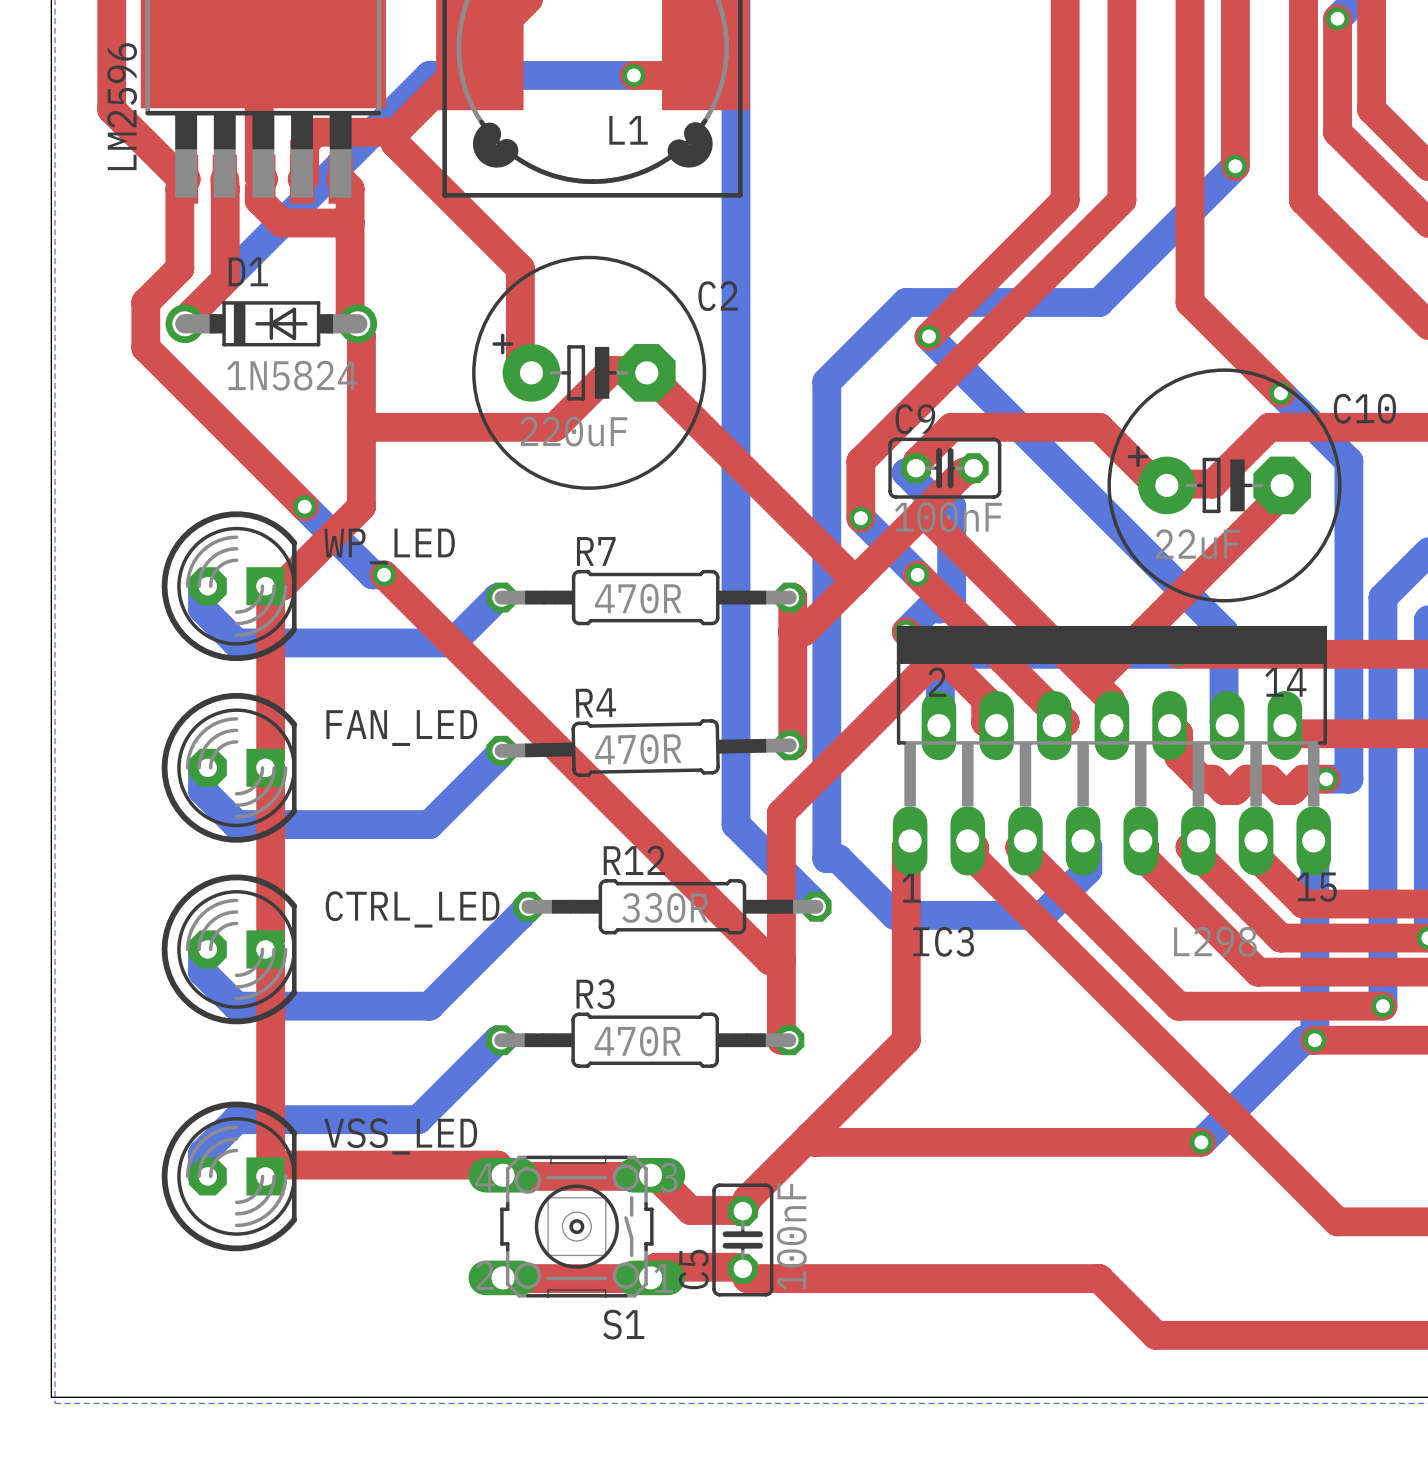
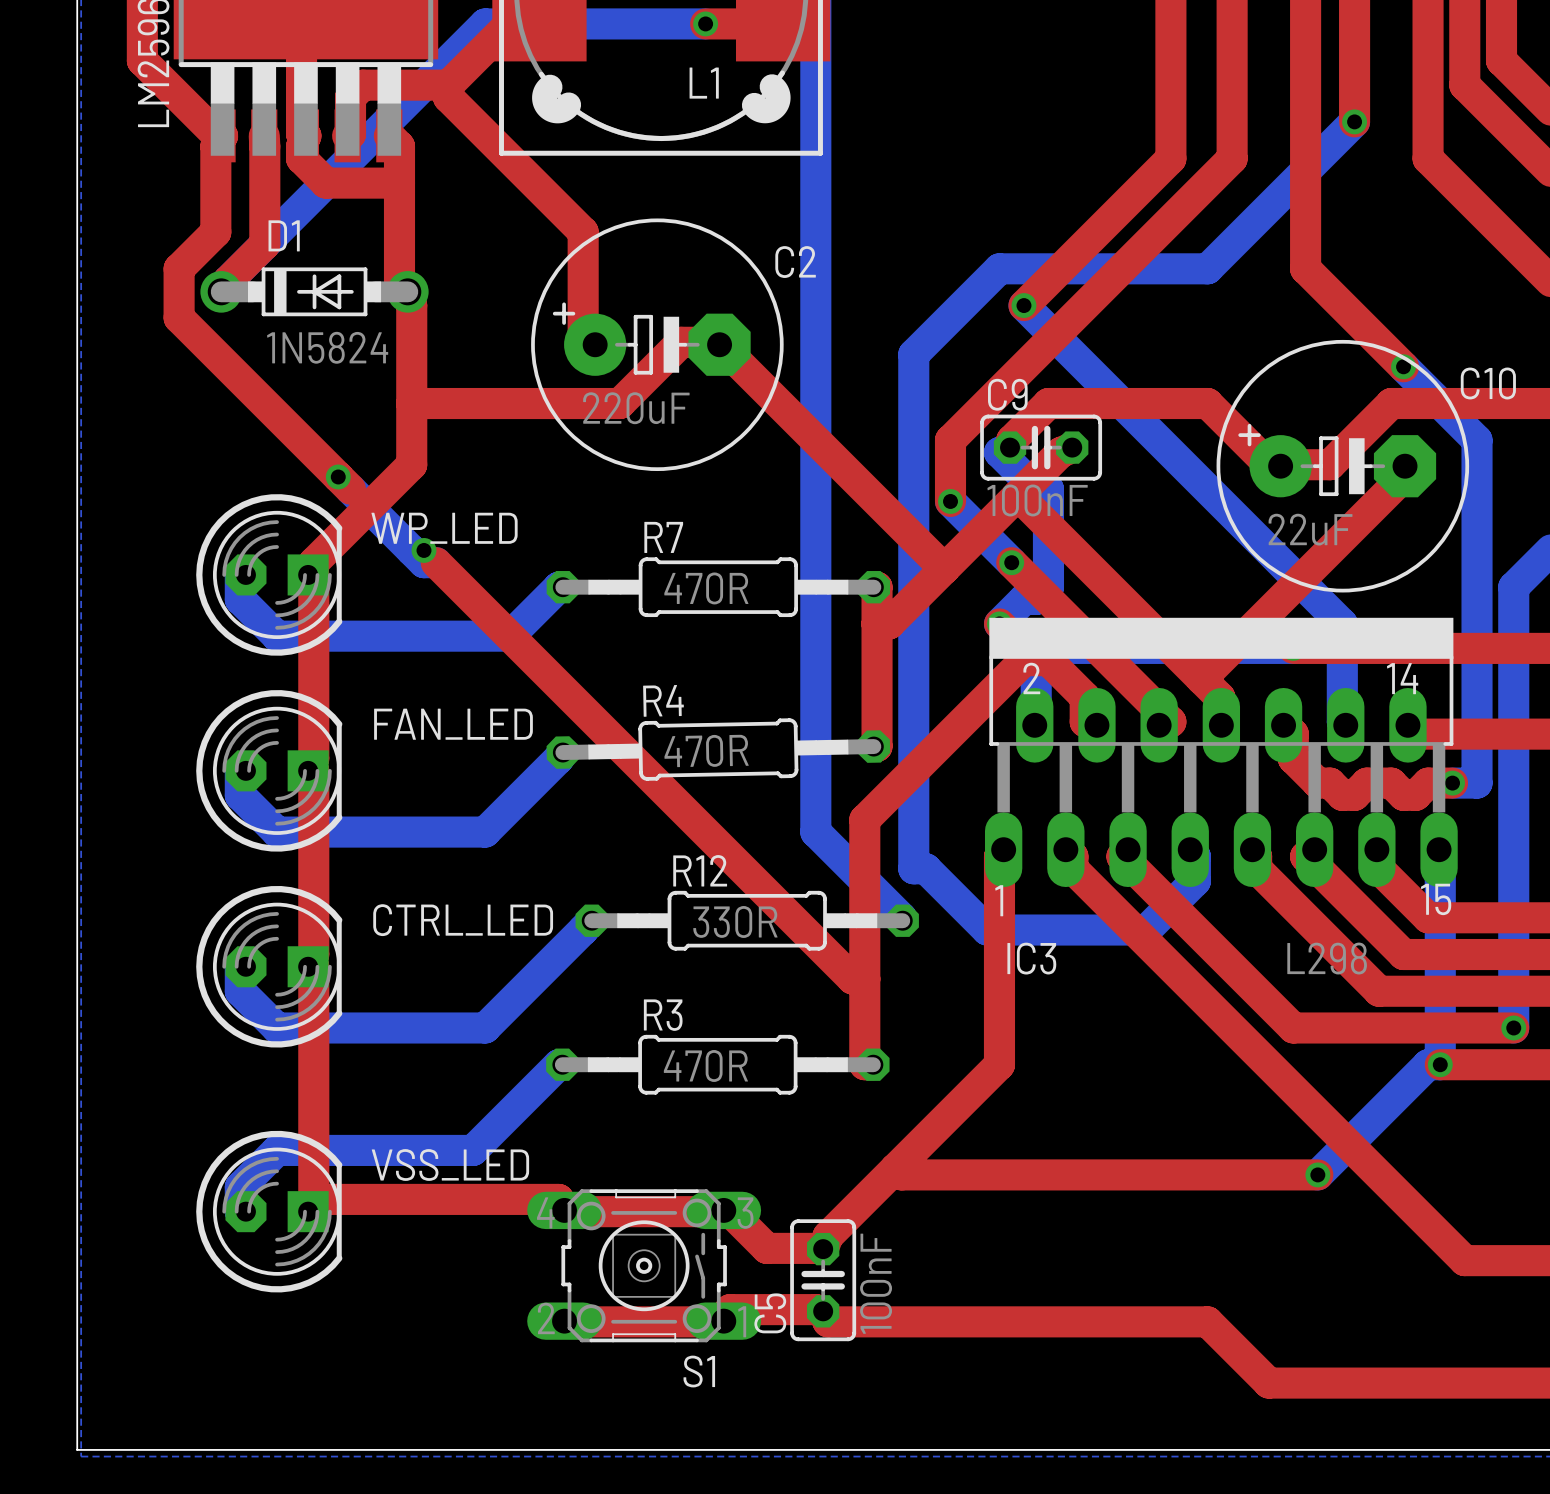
top track: (361, 484) (361, 506) (282, 586) (270, 586) -> (411, 464) (313, 562) (308, 574)
via position: (304, 506) -> (338, 476)
via position: (384, 574) -> (423, 550)

